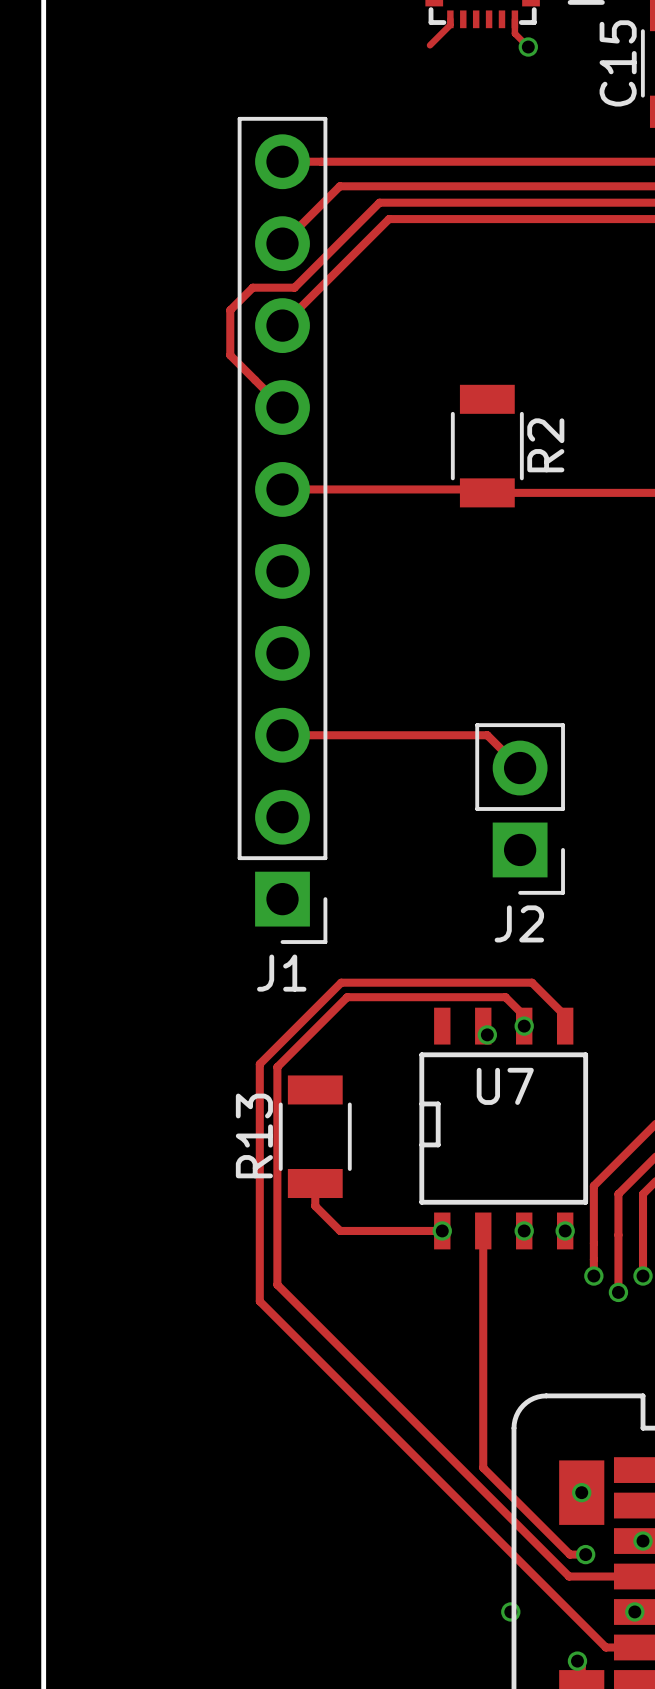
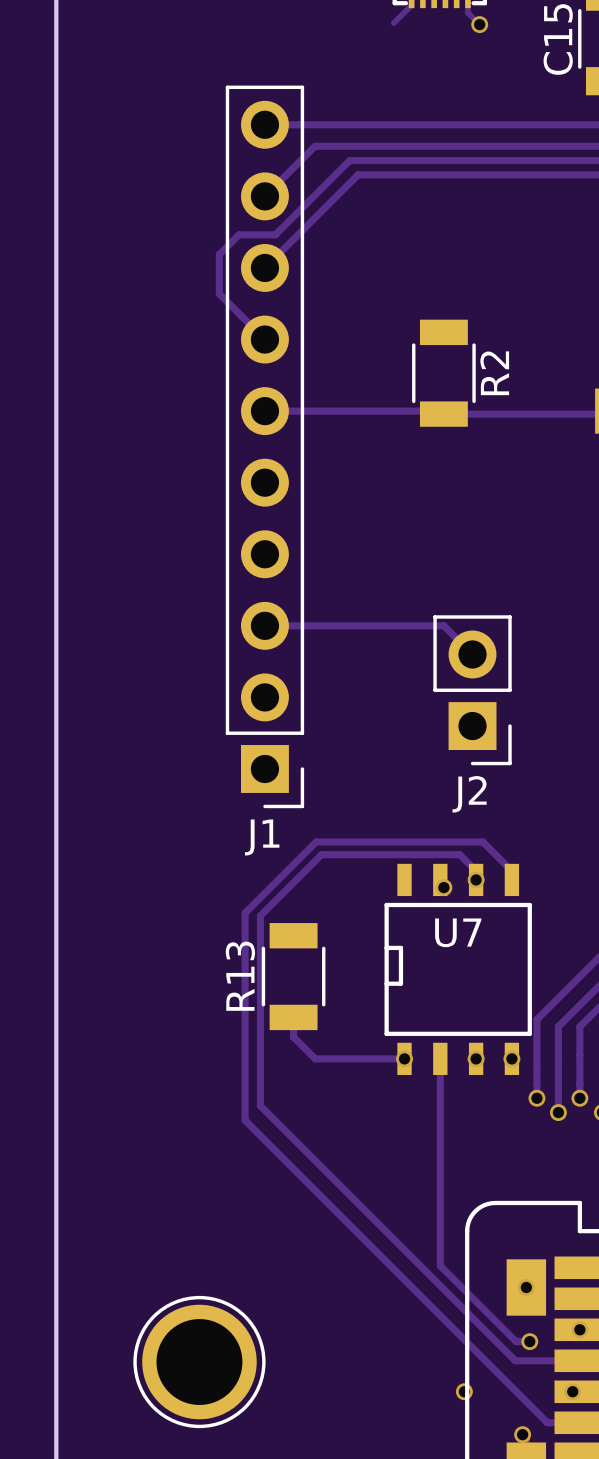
part: none -> (199, 1362)

